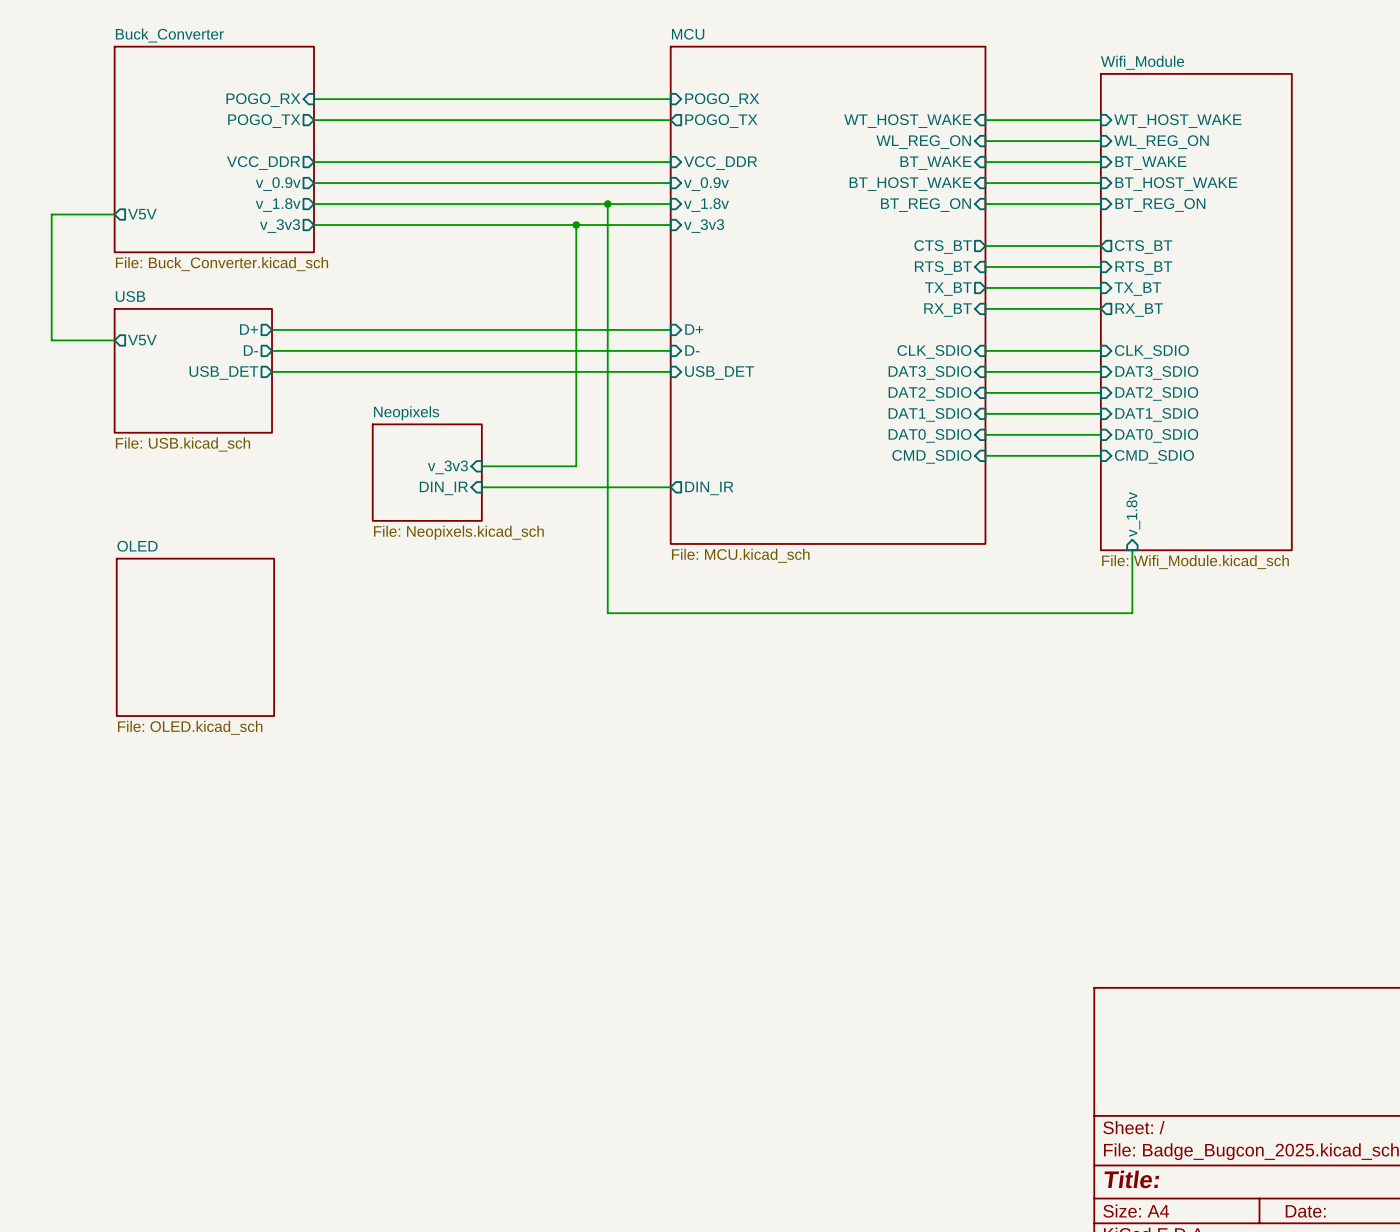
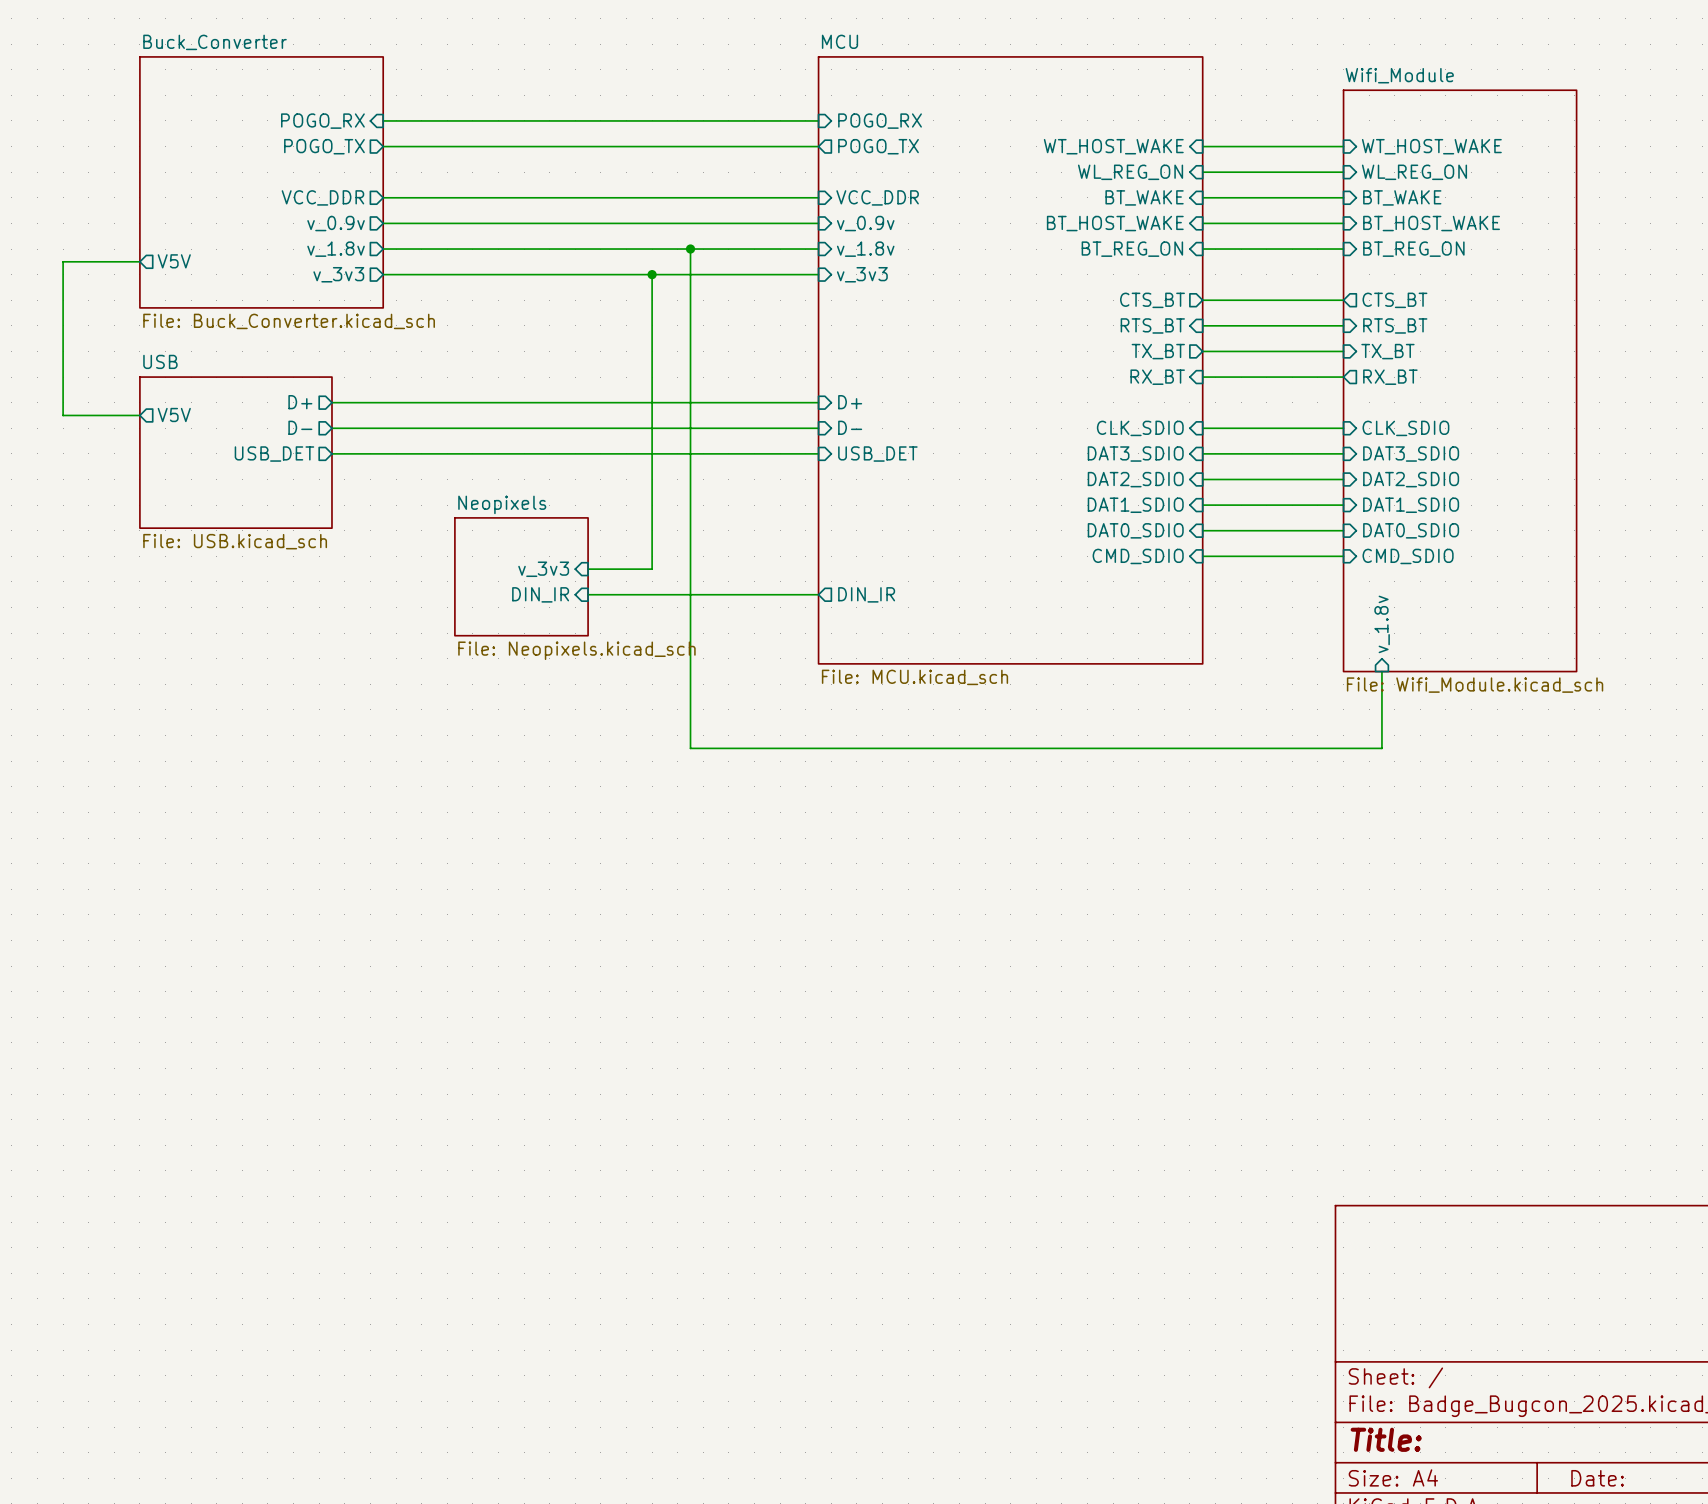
junction: none -> (690, 249)
wire: (607, 204) (607, 613) -> (690, 249) (690, 748) (741, 748)
junction: (607, 204) -> none
junction: none -> (652, 274)
wire: (576, 225) (576, 466) (534, 466) -> (652, 274) (652, 569)
junction: (576, 225) -> none
sheet OLED: File: OLED.kicad_sch (195, 637) -> none

